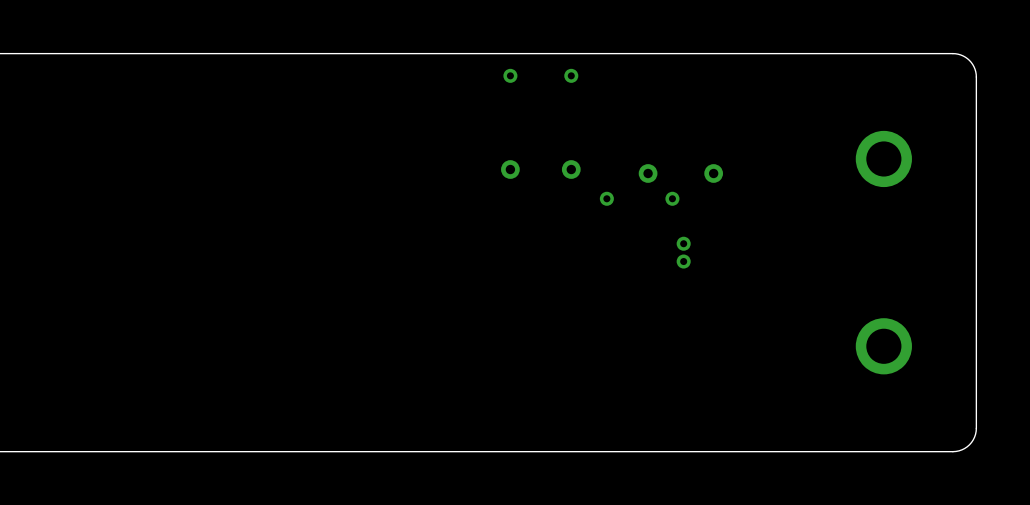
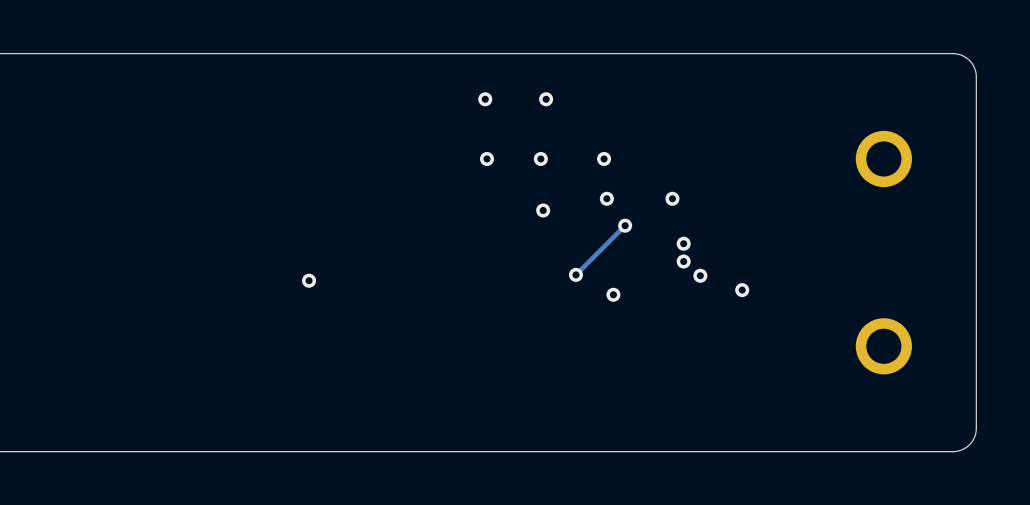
via: (510, 75) -> none
via: (571, 75) -> none
via: none -> (485, 99)
via: none -> (546, 99)
via: none -> (486, 158)
via: none -> (540, 158)
via: none -> (604, 158)
via: (510, 169) -> none
via: (571, 169) -> none
via: (648, 173) -> none
via: (713, 173) -> none
via: none -> (543, 210)
track: none -> (625, 225) (575, 274)
via: none -> (625, 225)
via: none -> (575, 274)
via: none -> (700, 275)
via: none -> (309, 280)
via: none -> (742, 290)
via: none -> (613, 294)

